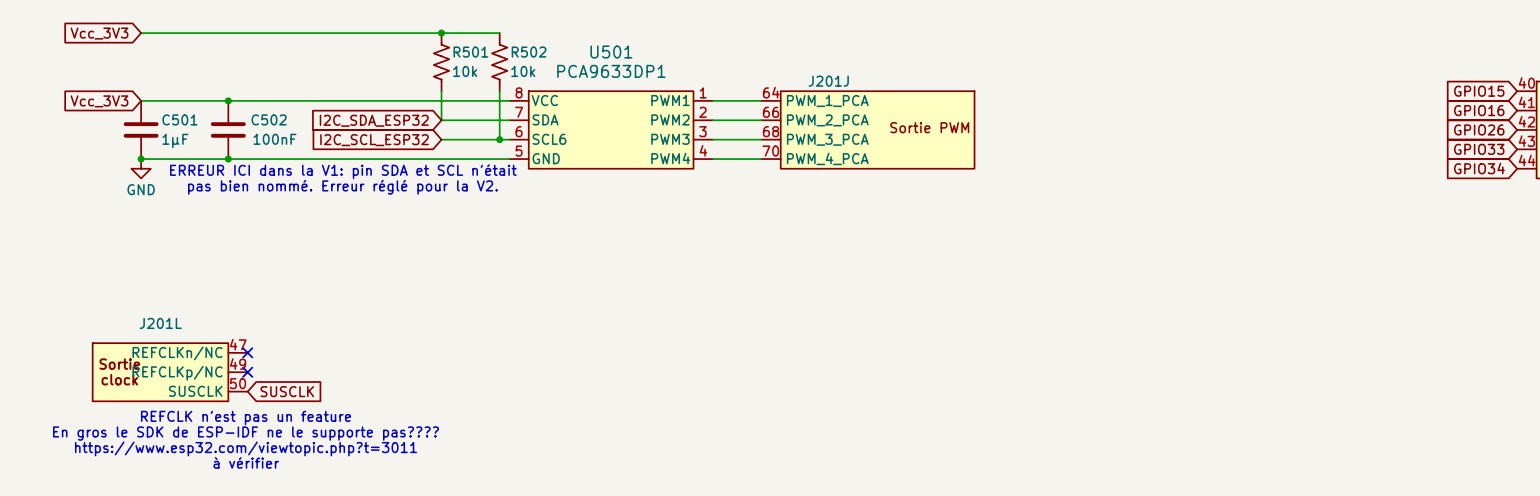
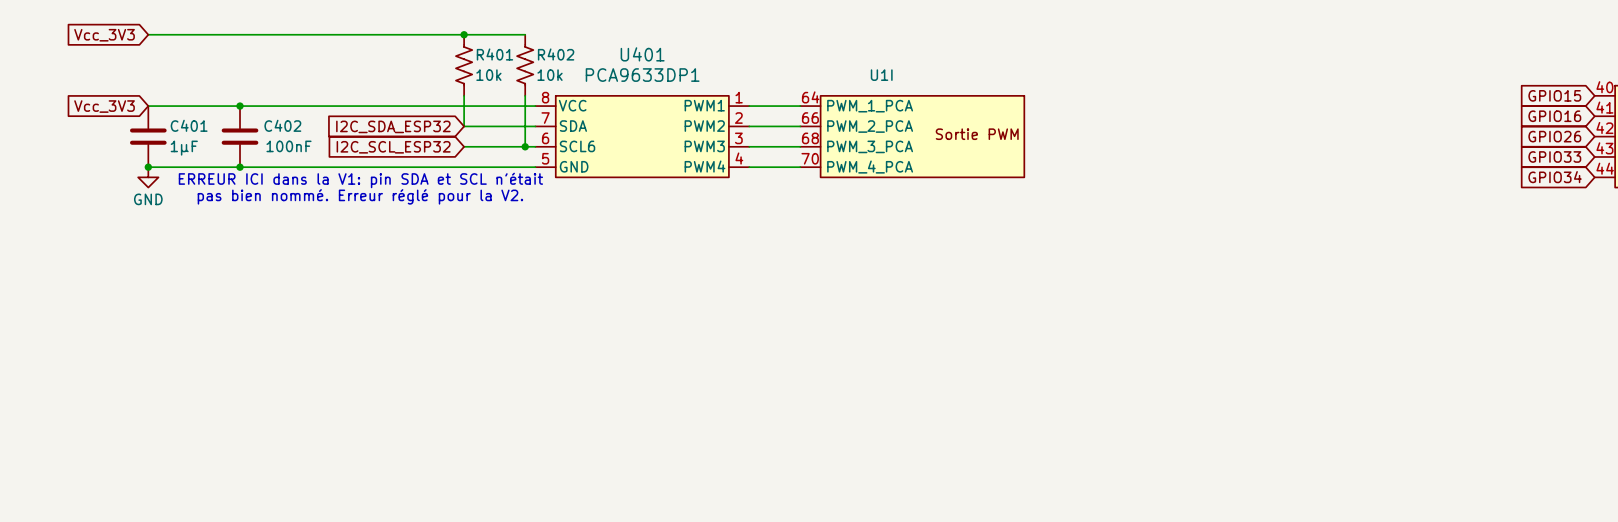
R501 name: R501 (470, 52) -> R401 (494, 54)
R502 name: R502 (529, 52) -> R402 (556, 54)
U501 name: U501 (611, 52) -> U401 (642, 54)
J201J name: J201J (828, 81) -> U1I (881, 75)
C501 name: C501 (179, 119) -> C401 (189, 125)
C502 name: C502 (269, 119) -> C402 (282, 125)
no-connect mark: (247, 352) -> none
J201L: (170, 372) -> none
no-connect mark: (247, 372) -> none
global label: SUSCLK (287, 391) -> none
text: REFCLK n'est pas un feature (246, 417) -> none
text: En gros le SDK de ESP-IDF ne le supporte pas???? (246, 433) -> none
text: https://www.esp32.com/viewtopic.php?t=3011 (246, 448) -> none
text: à vérifier (246, 462) -> none

